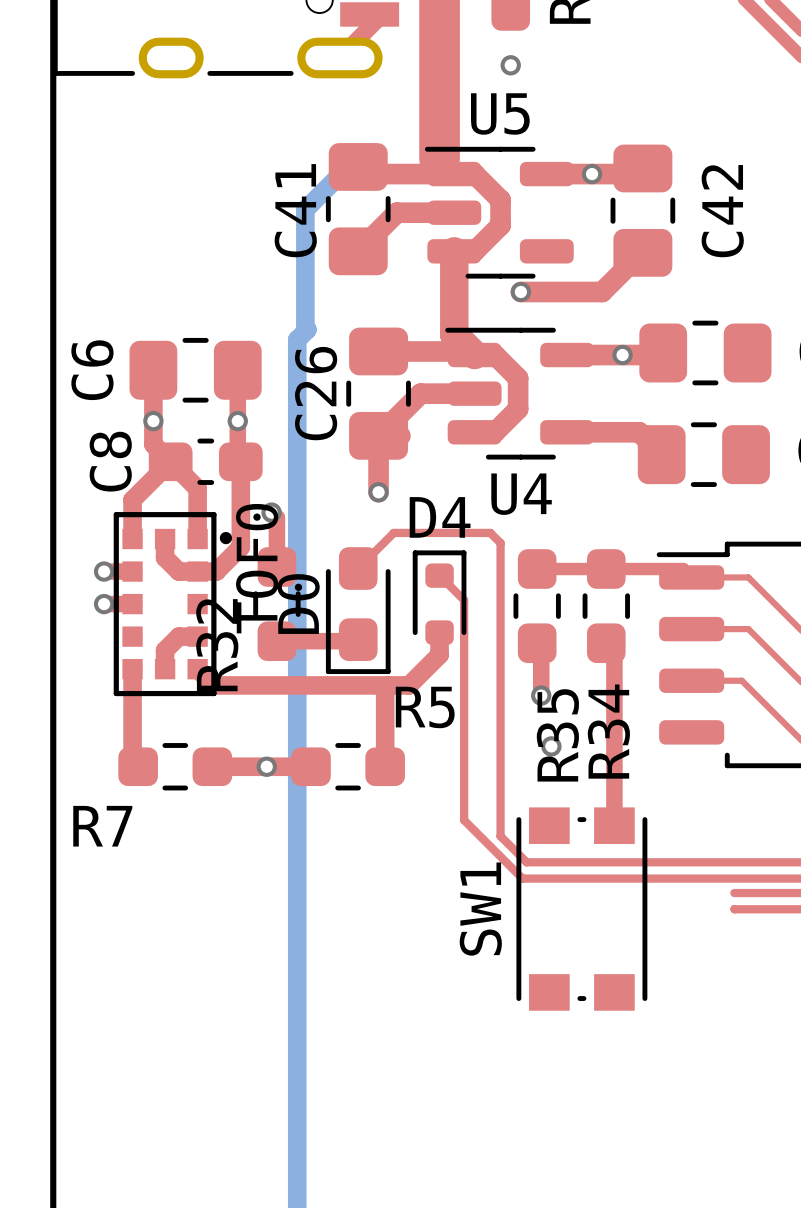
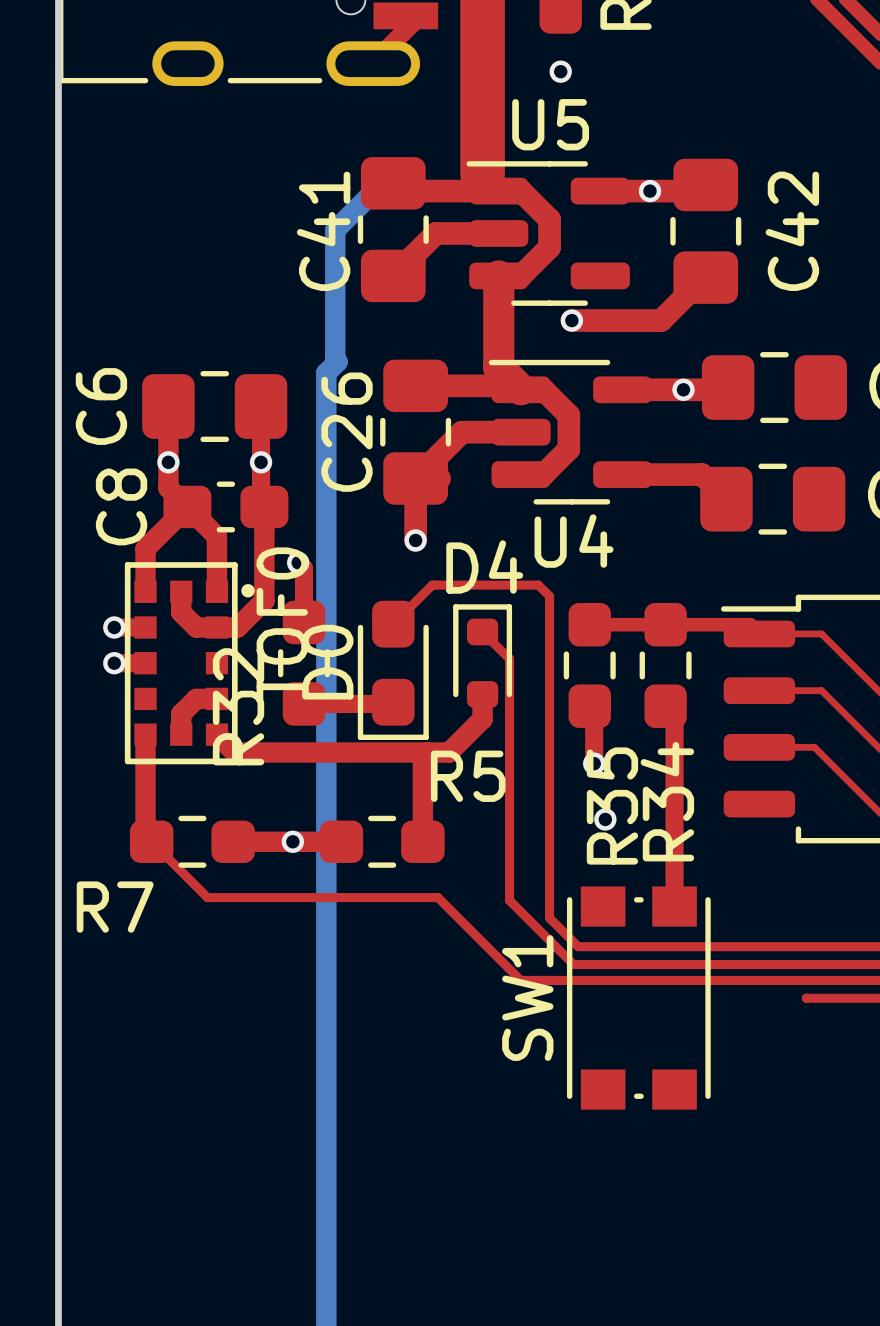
top track: none -> (151, 841) (207, 897) (437, 897) (520, 980) (806, 980)

